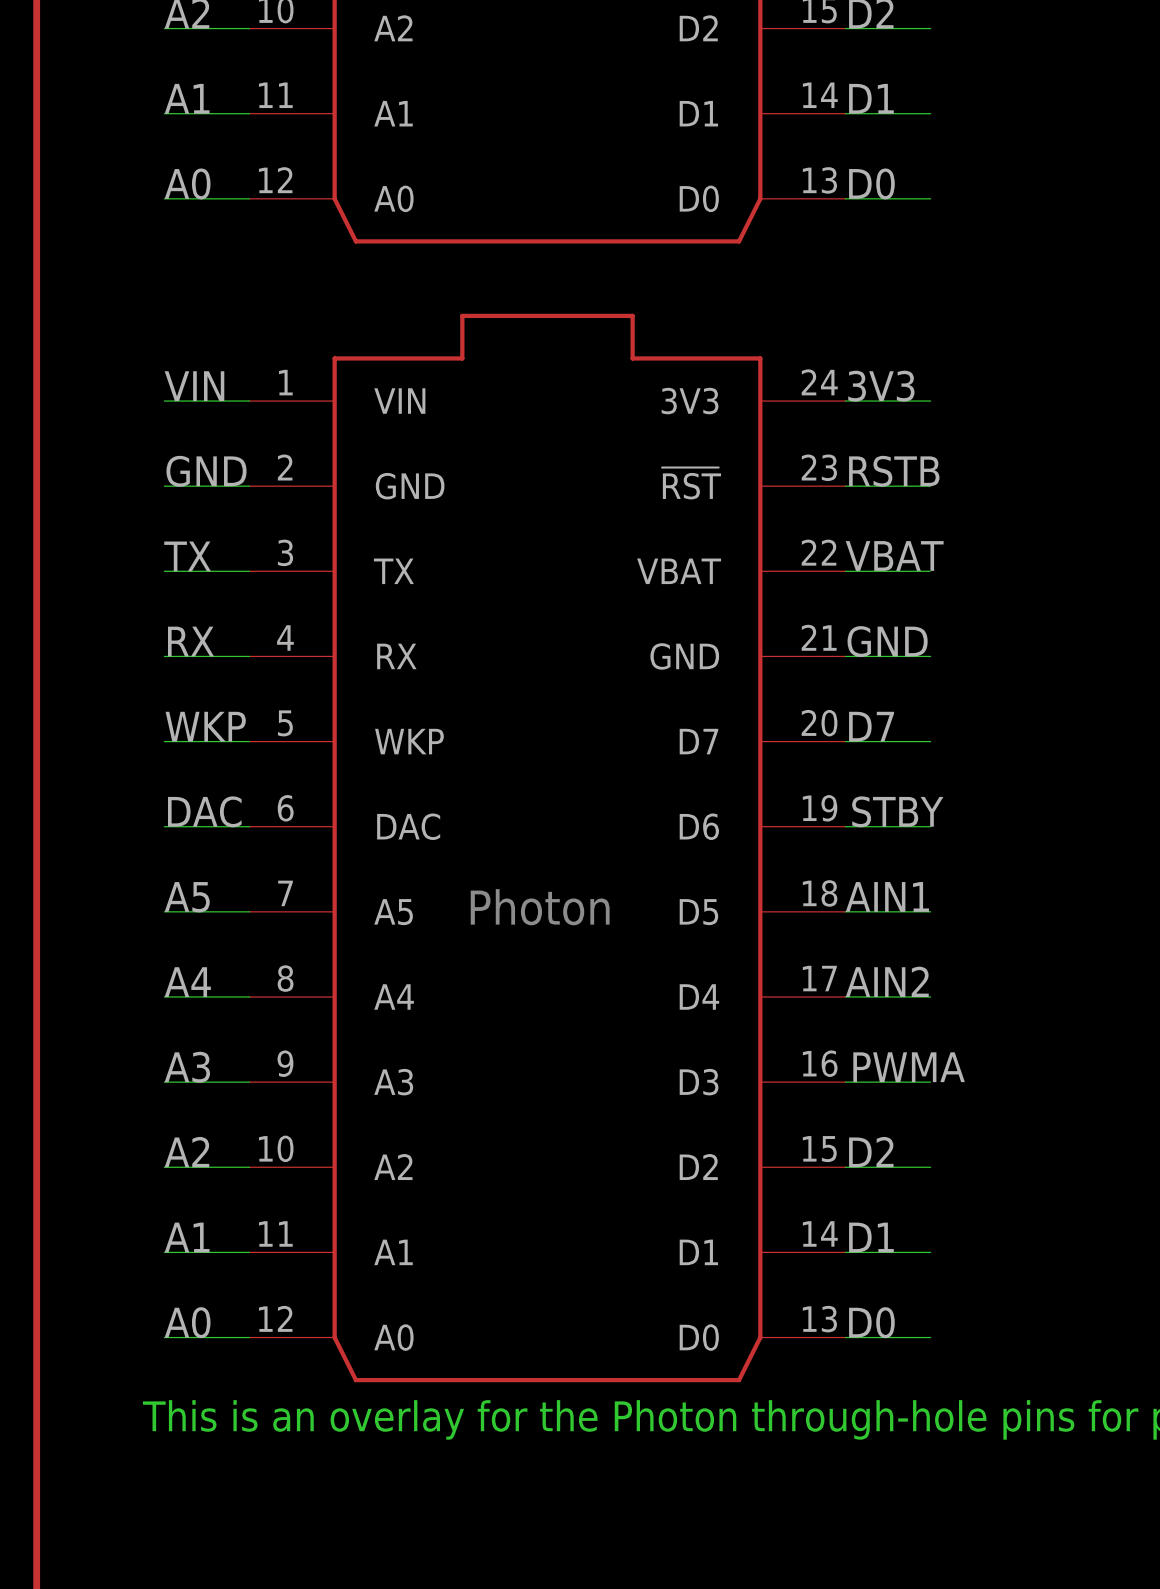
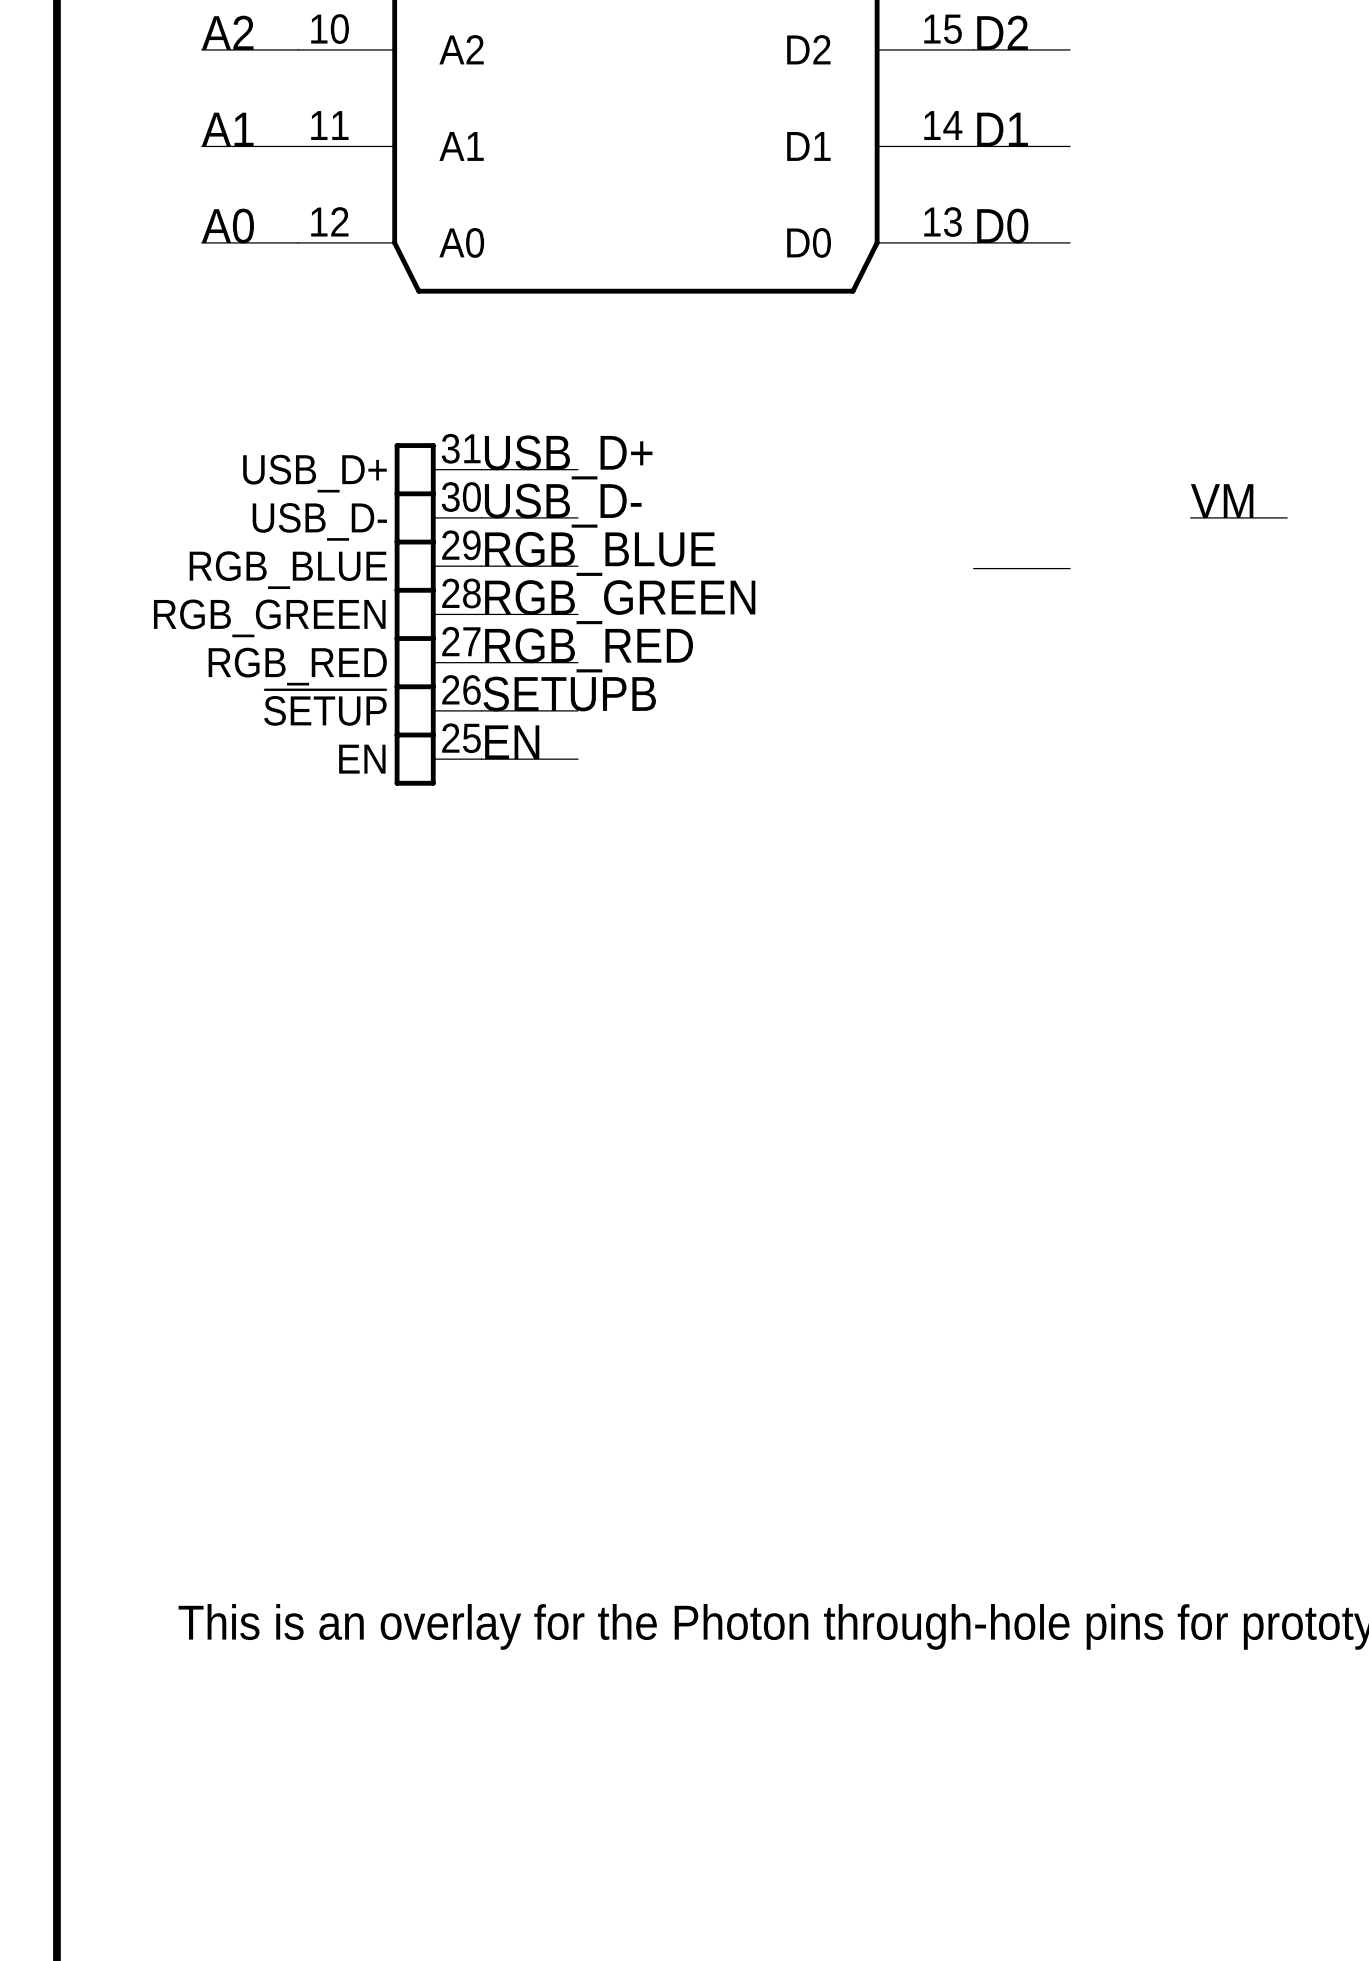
label: VIN (194, 386) -> none
label: 3V3 (881, 386) -> none
label: none -> USB_D+ (568, 457)
wire: (164, 401) (249, 401) -> (481, 469) (578, 469)
wire: (845, 401) (930, 401) -> (1190, 517) (1287, 517)
label: none -> VM (1222, 501)
label: none -> USB_D- (563, 505)
wire: none -> (481, 517) (578, 517)
label: GND (206, 471) -> none
label: RSTB (894, 471) -> none
label: none -> RGB_BLUE (600, 553)
wire: (164, 486) (249, 486) -> (481, 566) (578, 566)
label: none -> RGB_GREEN (620, 602)
part: none -> (438, 614)
label: VBAT (894, 555) -> none
label: TX (187, 556) -> none
label: none -> RGB_RED (589, 650)
wire: (164, 571) (249, 571) -> (481, 662) (578, 662)
wire: (845, 571) (930, 571) -> none
label: none -> SETUPB (569, 694)
label: none -> EN (512, 742)
label: RX (190, 641) -> none
label: GND (887, 641) -> none
wire: (164, 656) (249, 656) -> (481, 759) (578, 759)
wire: (845, 656) (930, 656) -> none
label: WKP (205, 726) -> none
label: D7 (871, 726) -> none
wire: (164, 741) (249, 741) -> (481, 710) (578, 710)
wire: (845, 741) (930, 741) -> none
label: DAC (204, 811) -> none
label: STBY (897, 811) -> none
wire: (164, 826) (249, 826) -> (481, 614) (578, 614)
wire: (845, 826) (930, 826) -> none
part: (547, 848) -> none
label: AIN1 (887, 896) -> none
label: A5 (187, 897) -> none
wire: (164, 911) (249, 911) -> none
wire: (845, 911) (930, 911) -> none
label: AIN2 (887, 981) -> none
label: A4 (187, 982) -> none
wire: (164, 996) (249, 996) -> none
wire: (845, 996) (930, 996) -> none
label: A3 (187, 1067) -> none
label: PWMA (909, 1067) -> none
wire: (164, 1082) (249, 1082) -> none
wire: (845, 1082) (930, 1082) -> none
label: A2 (186, 1152) -> none
label: D2 (871, 1152) -> none
wire: (164, 1167) (249, 1167) -> none
wire: (845, 1167) (930, 1167) -> none
label: A1 (187, 1237) -> none
label: D1 (871, 1237) -> none
wire: (164, 1252) (249, 1252) -> none
wire: (845, 1252) (930, 1252) -> none
label: A0 (187, 1322) -> none
label: D0 (871, 1322) -> none
wire: (164, 1337) (249, 1337) -> none
wire: (845, 1337) (930, 1337) -> none

